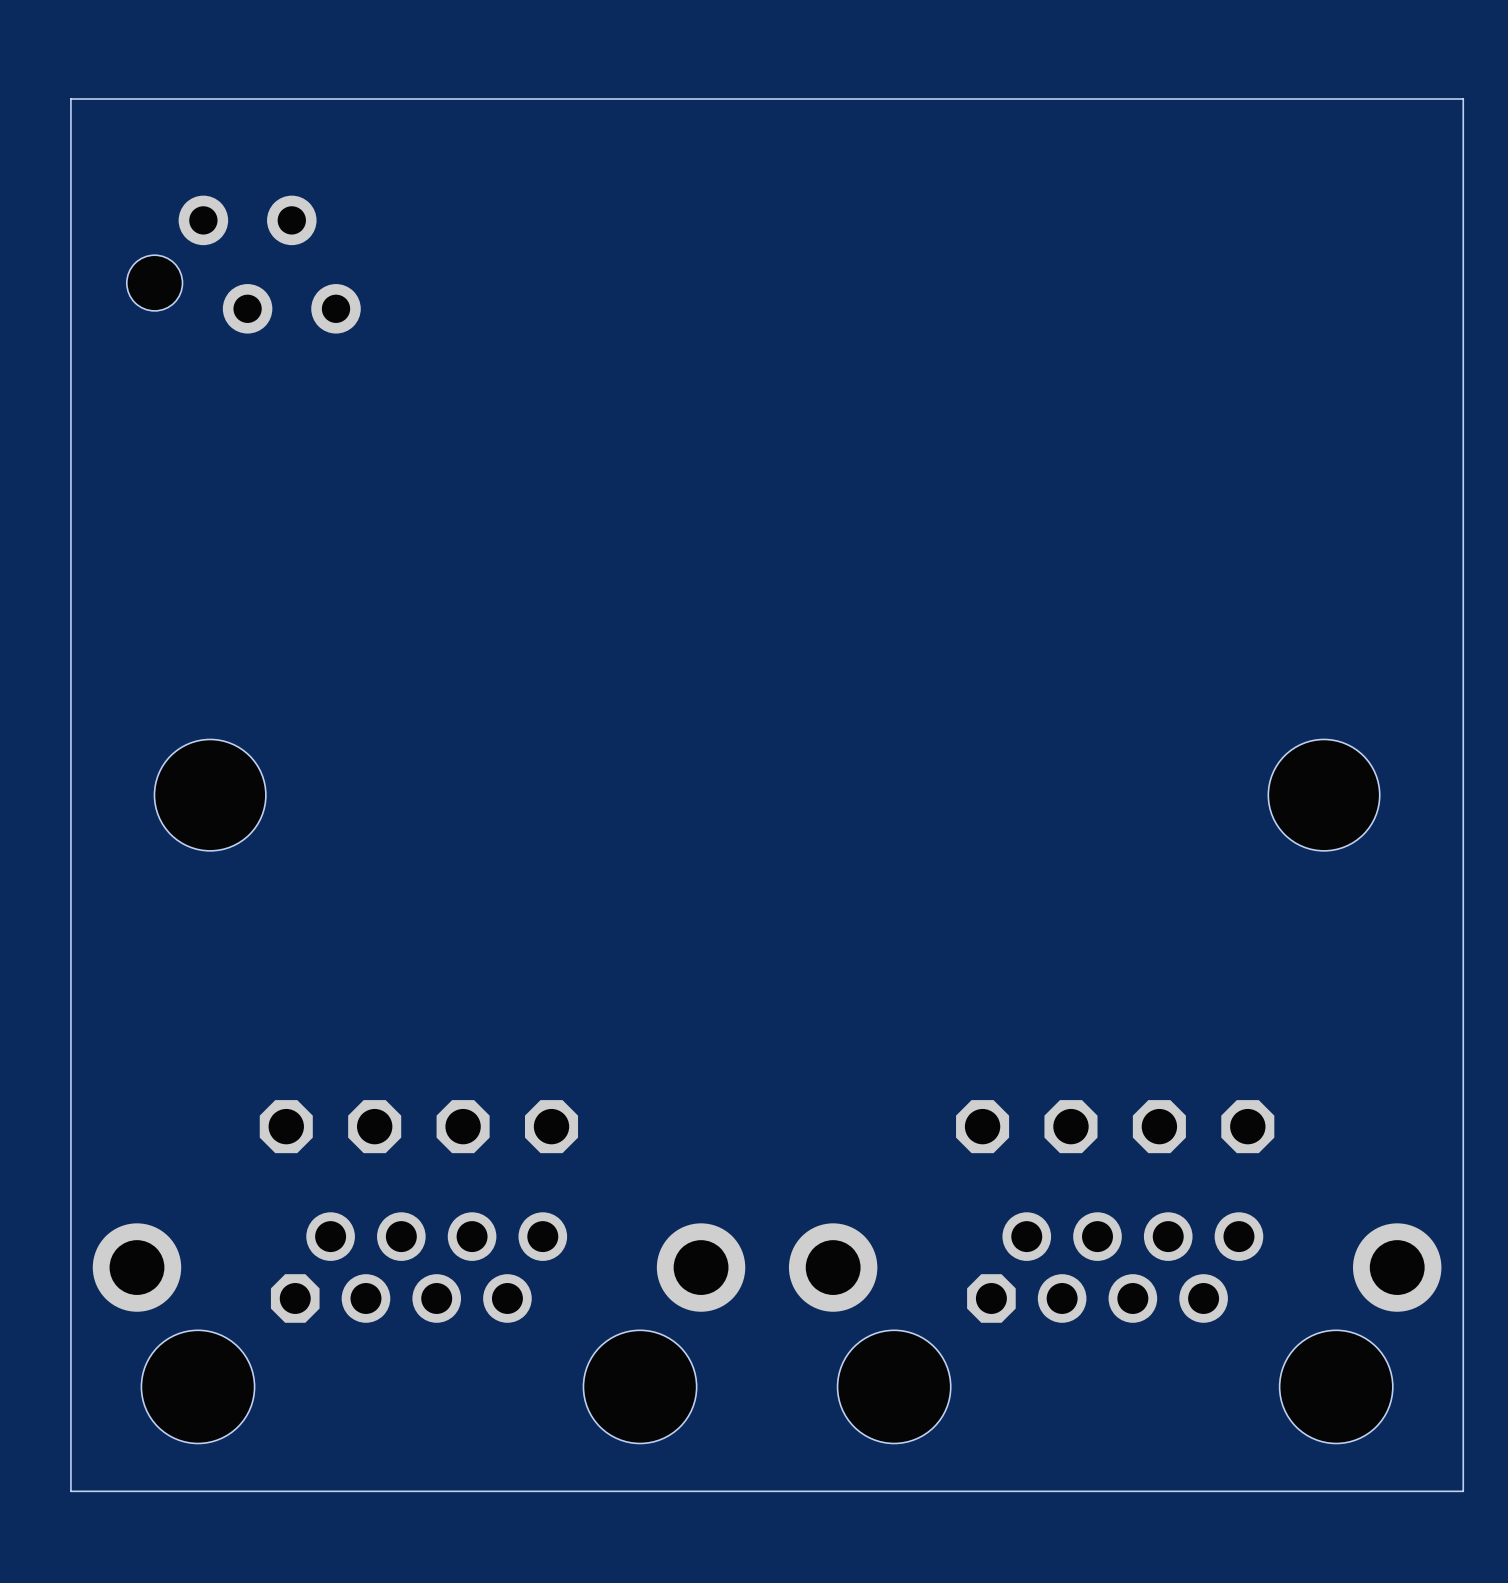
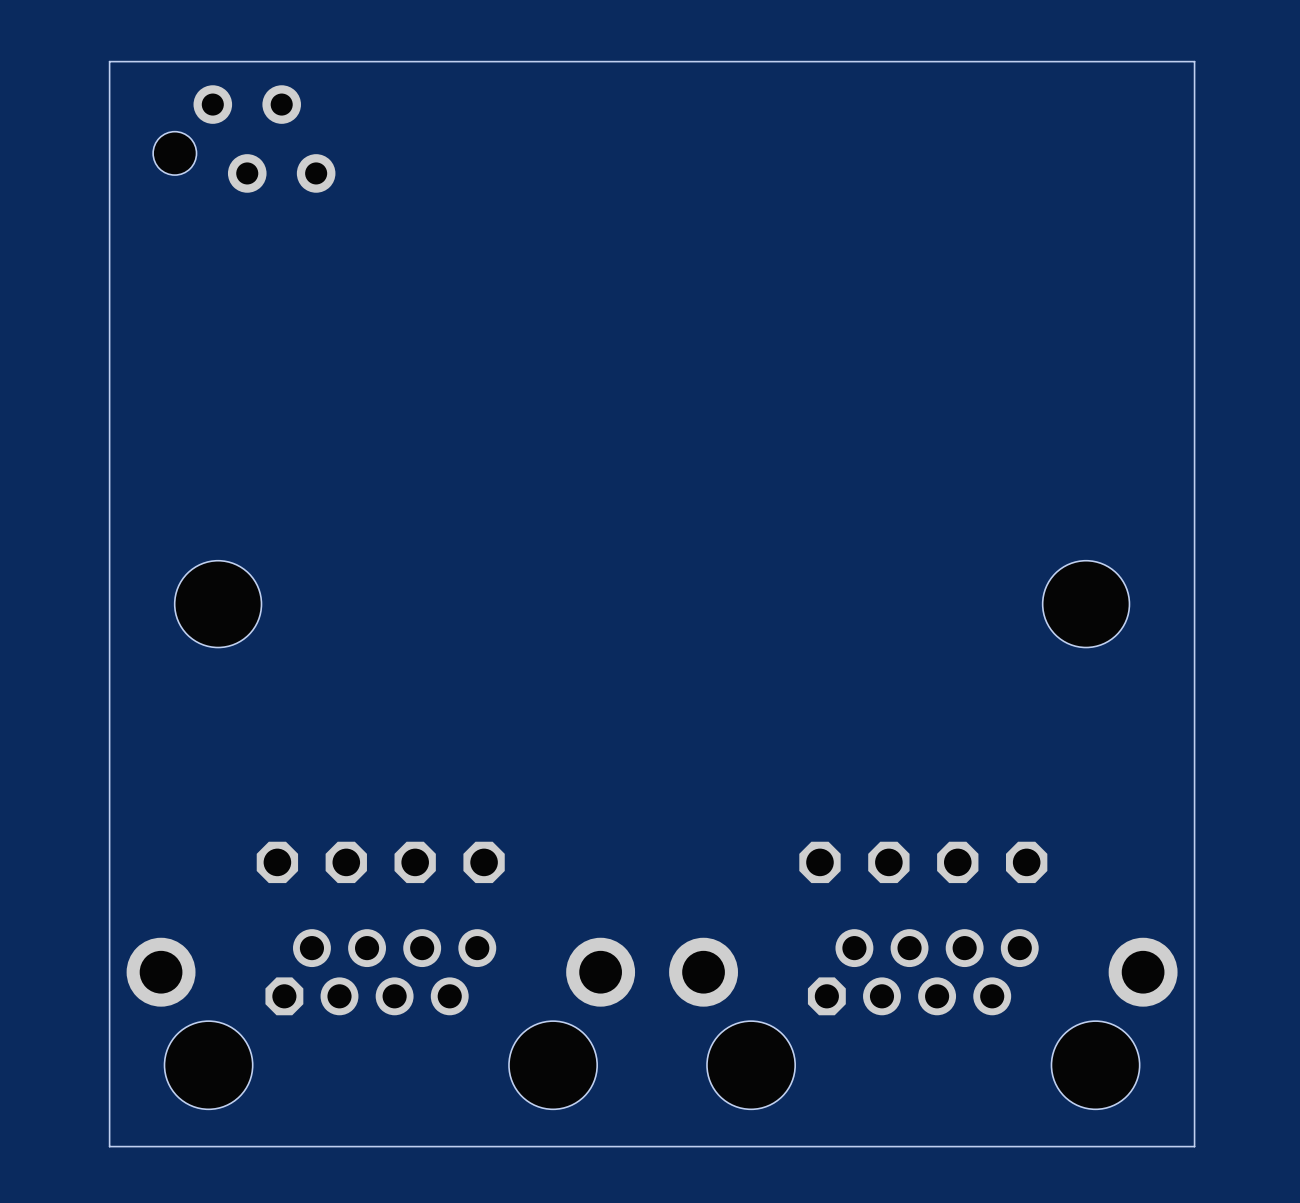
part position: (243, 264) -> (244, 139)

